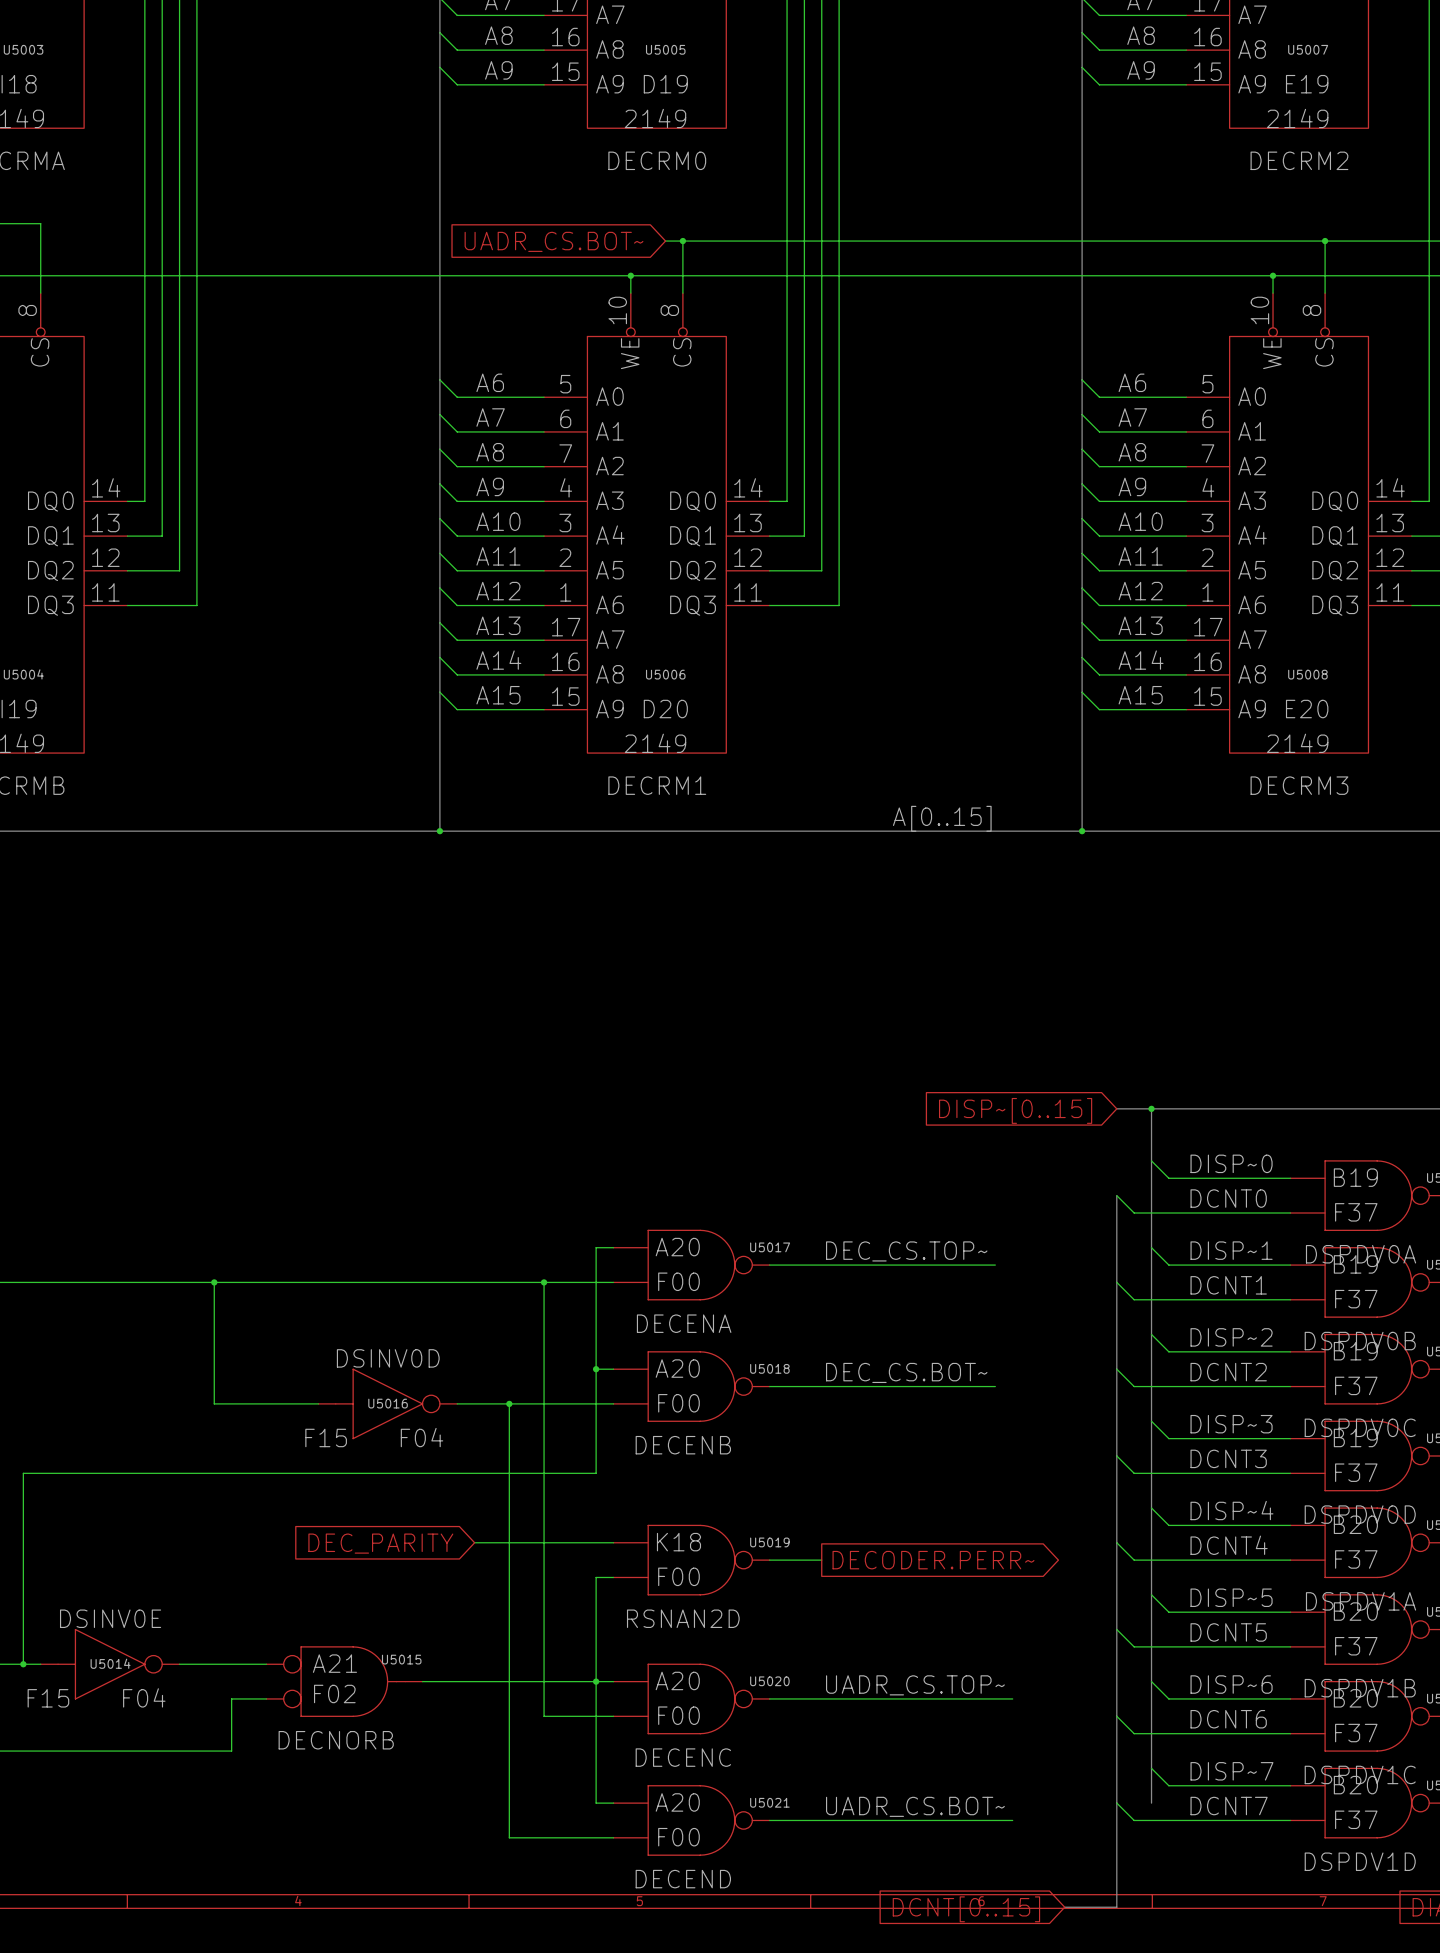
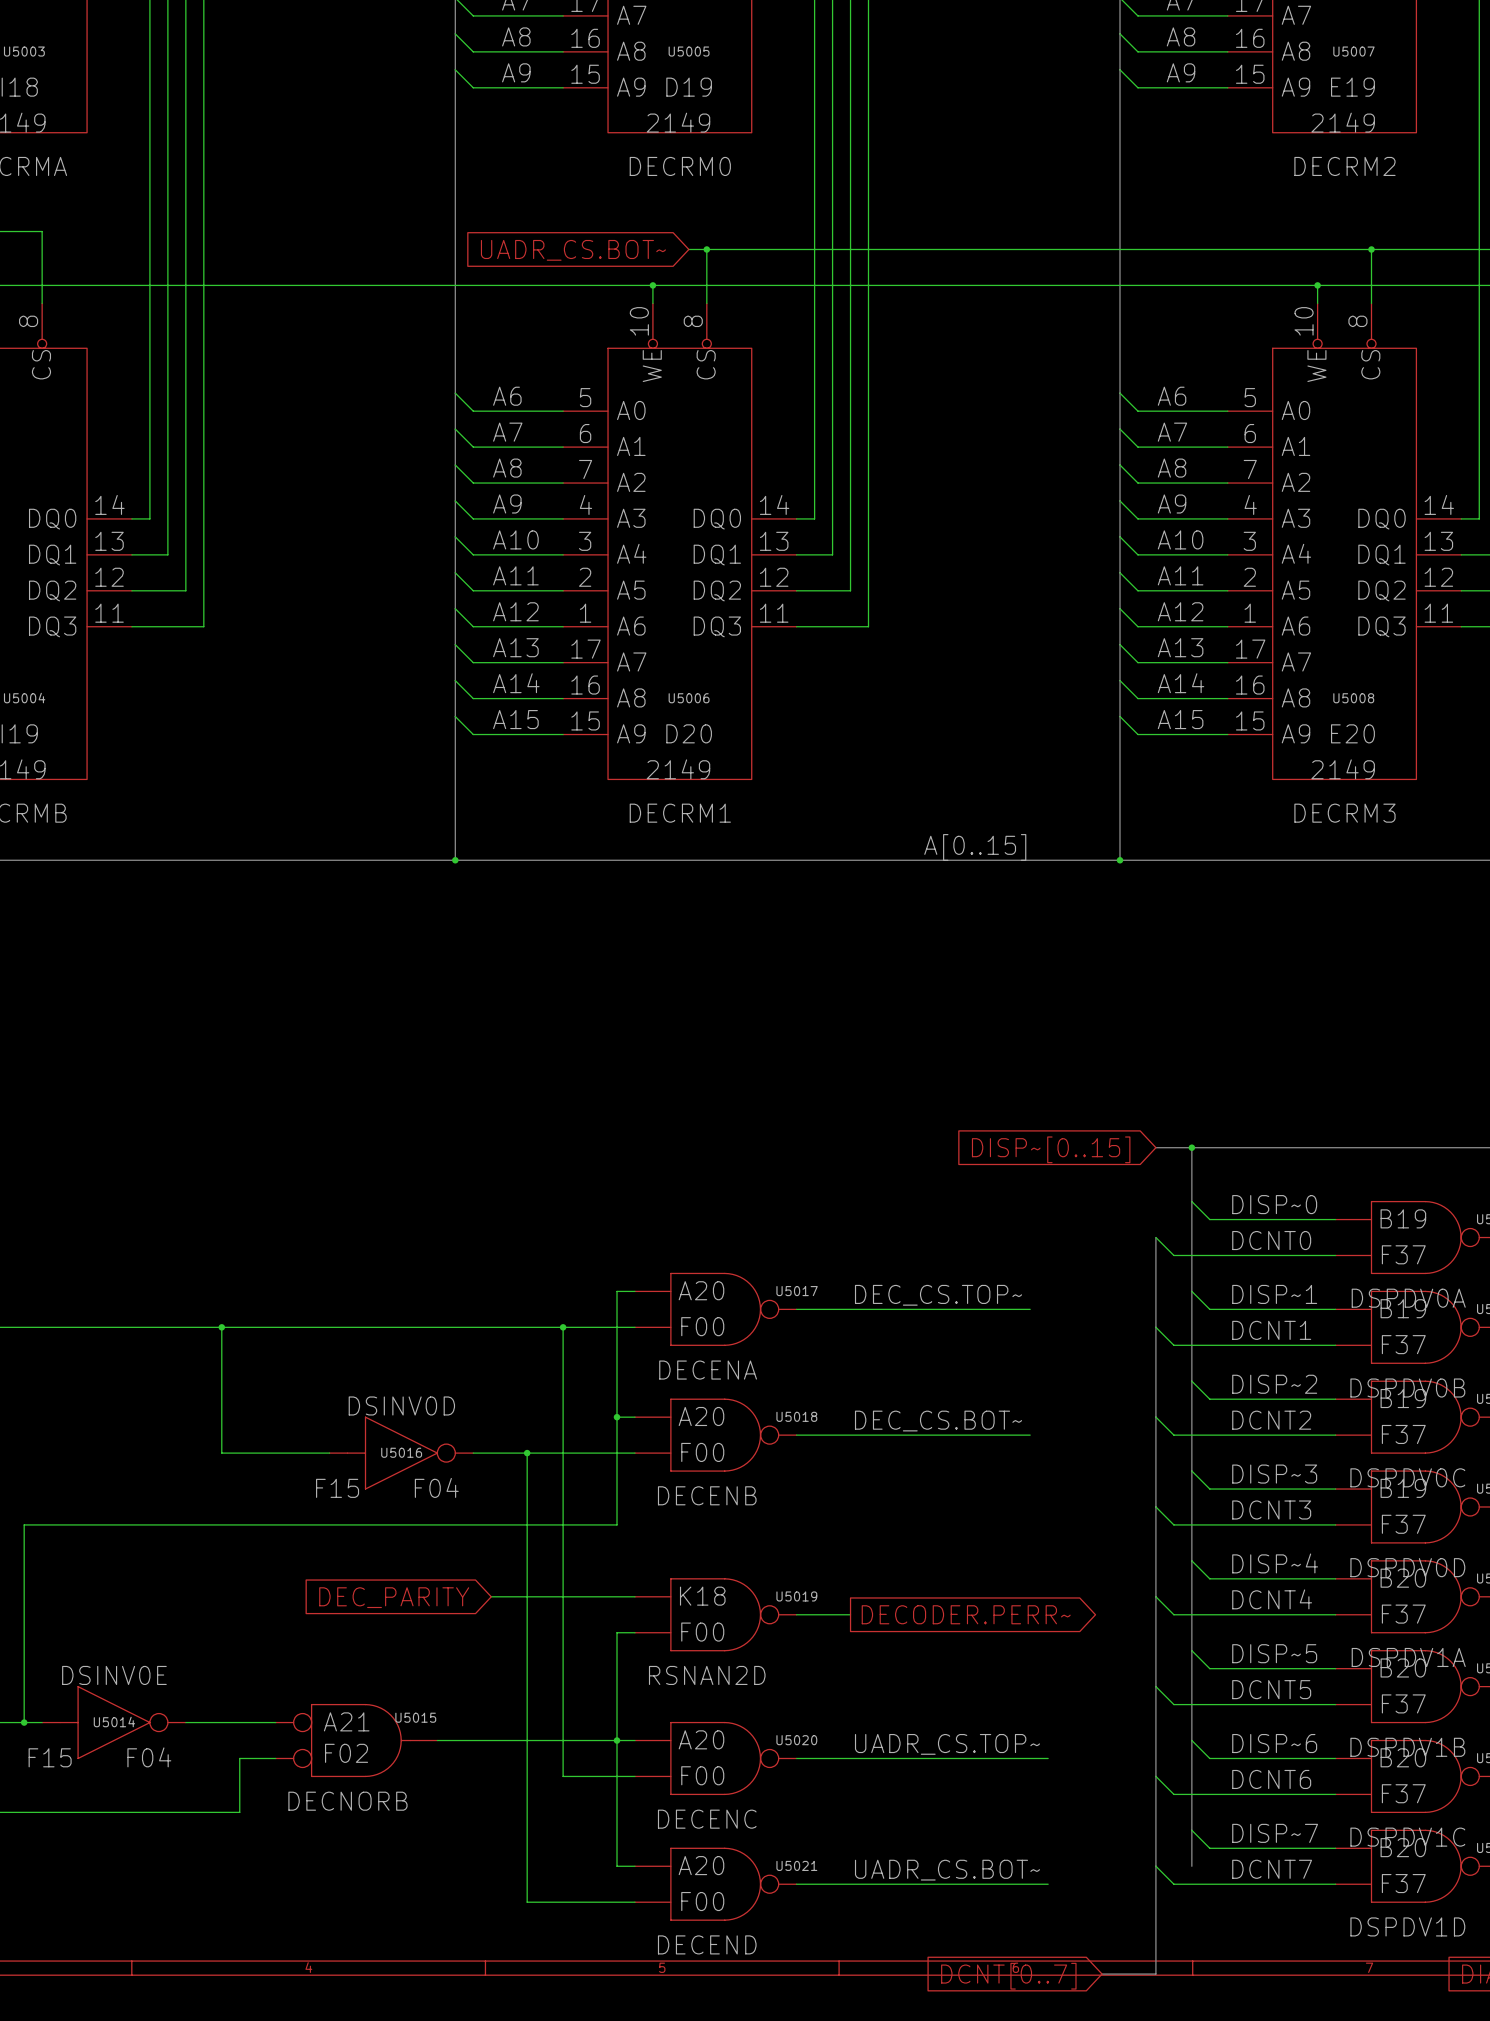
global label: DCNT[0..15] (966, 1909) -> DCNT[0..7] (1008, 1976)

